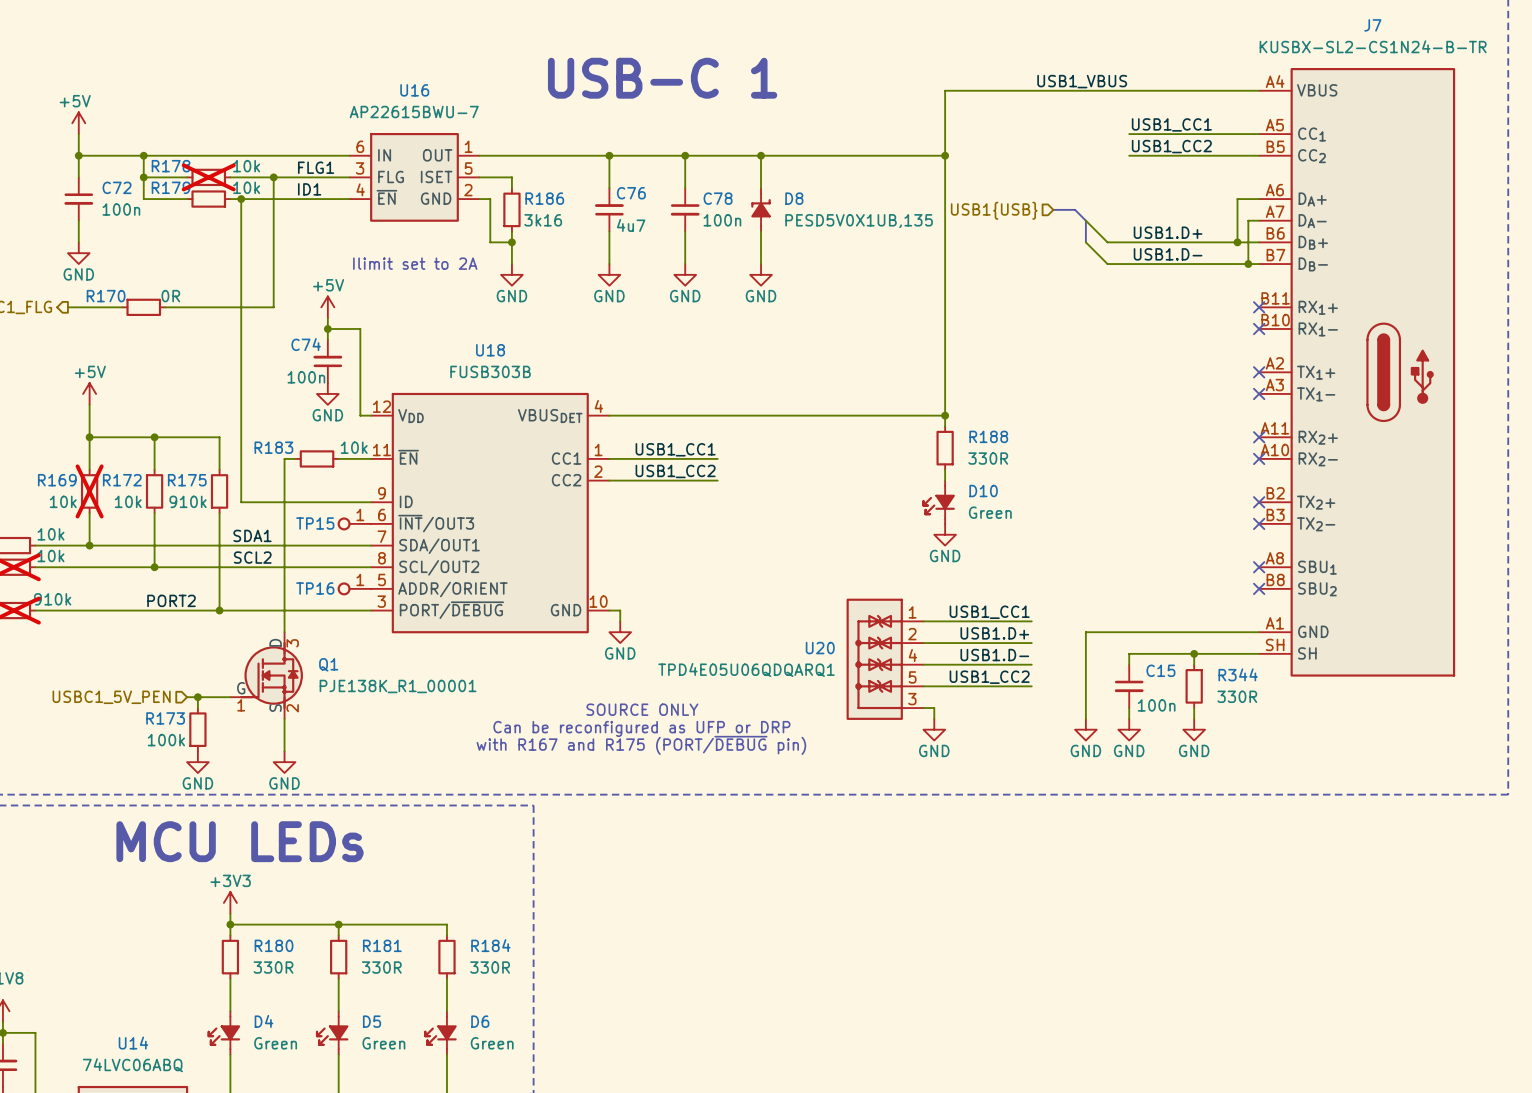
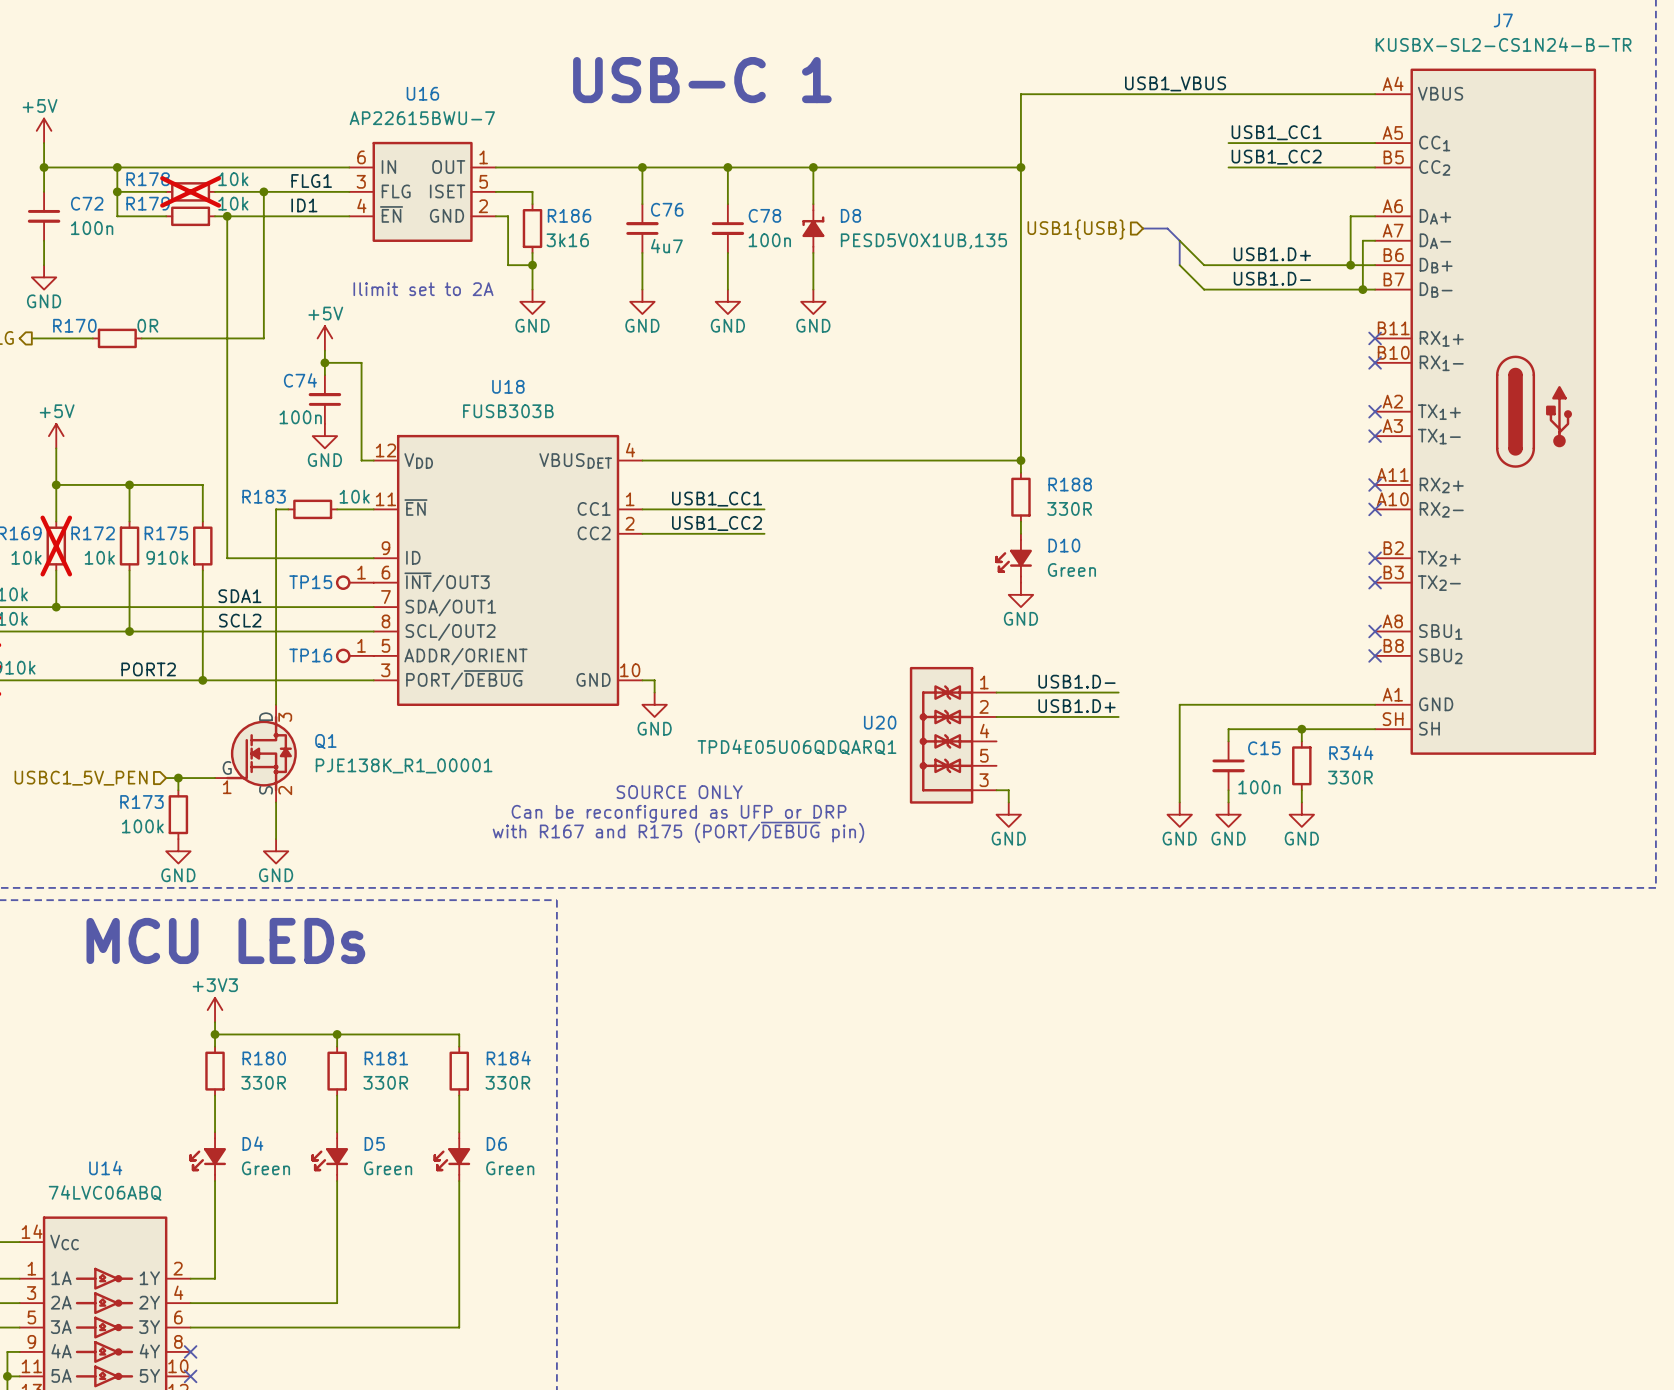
label: USB1_CC1 (989, 612) -> USB1.D- (1076, 681)
label: USB1.D- (994, 655) -> none
wire: (923, 664) (1031, 664) -> none
label: USB1_CC2 (989, 677) -> none
wire: (923, 686) (1031, 686) -> none

